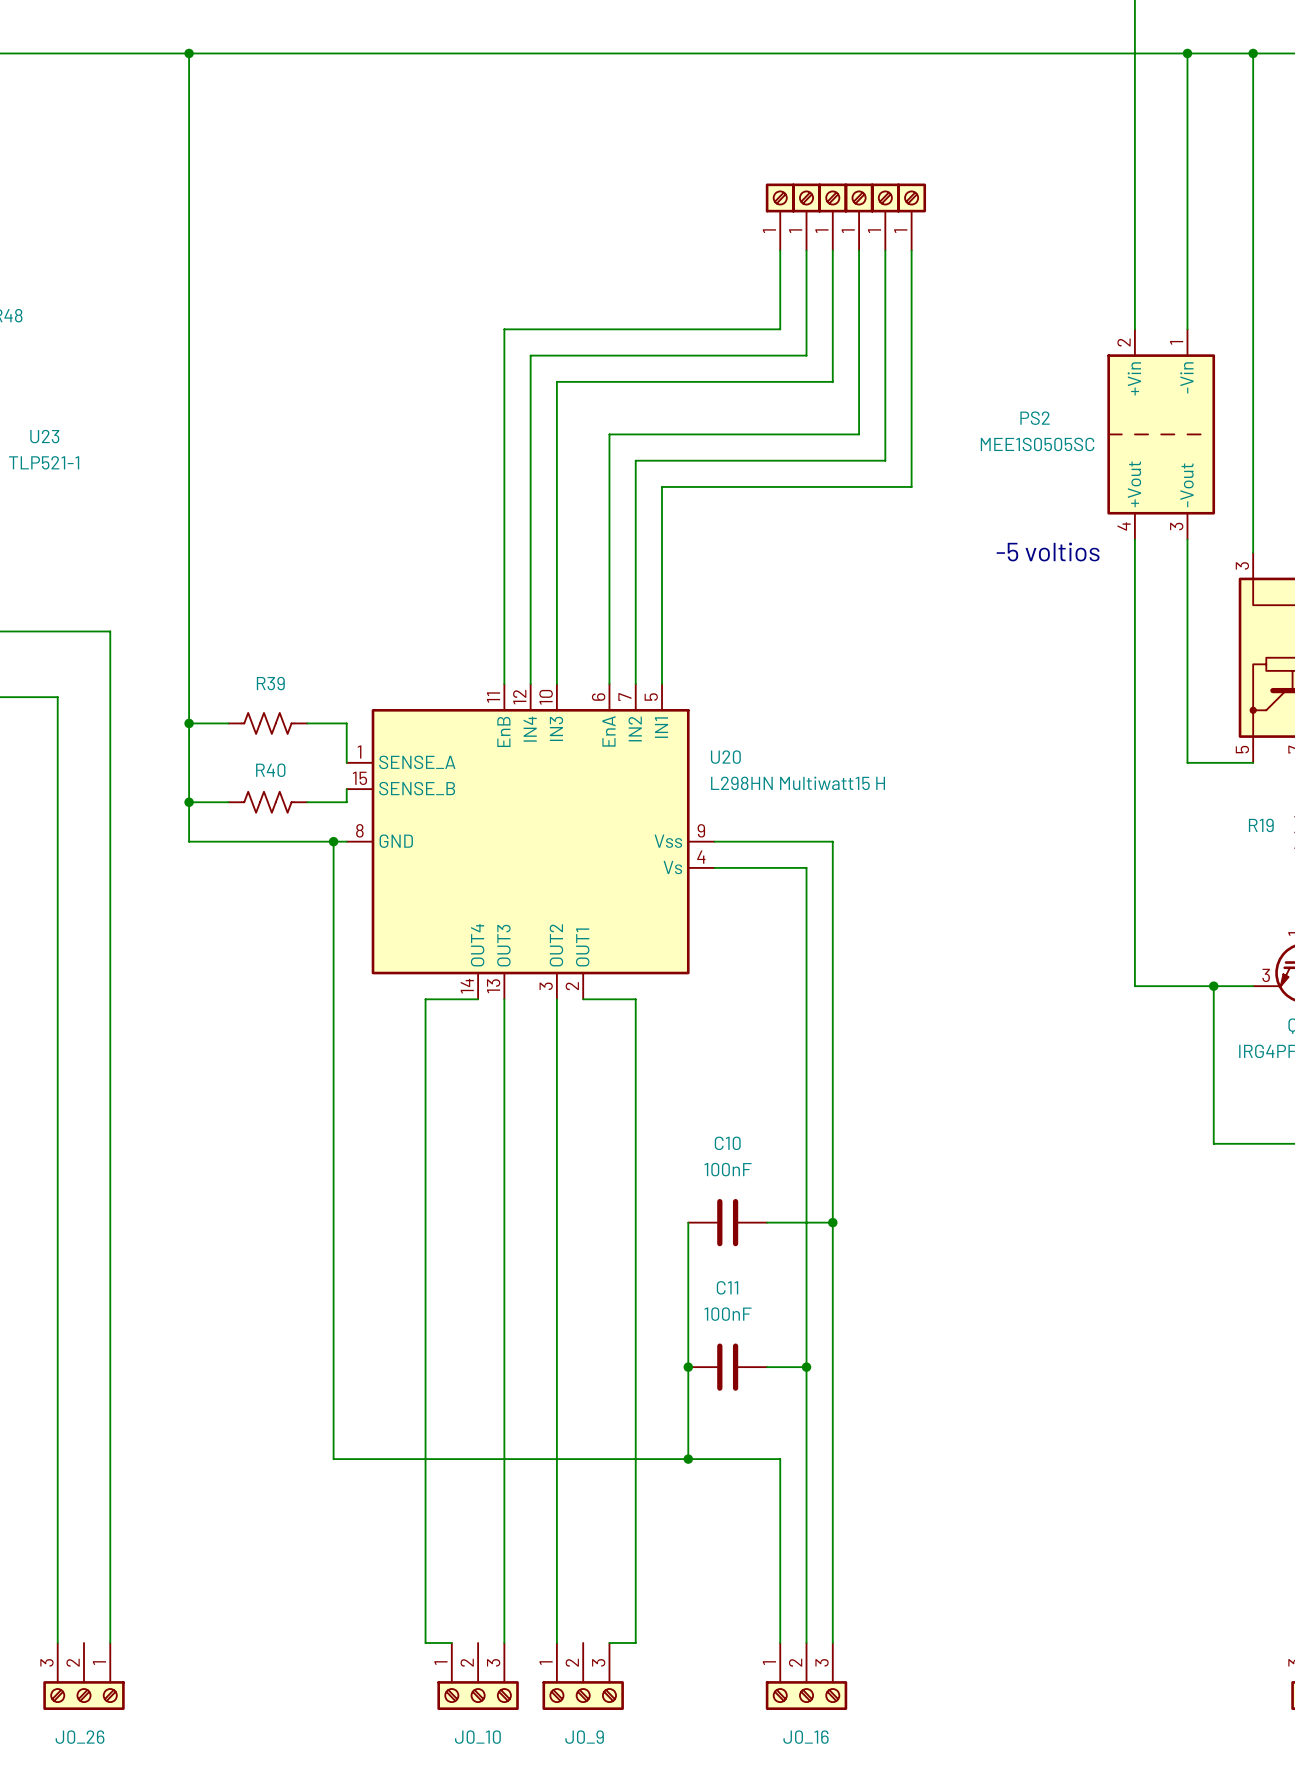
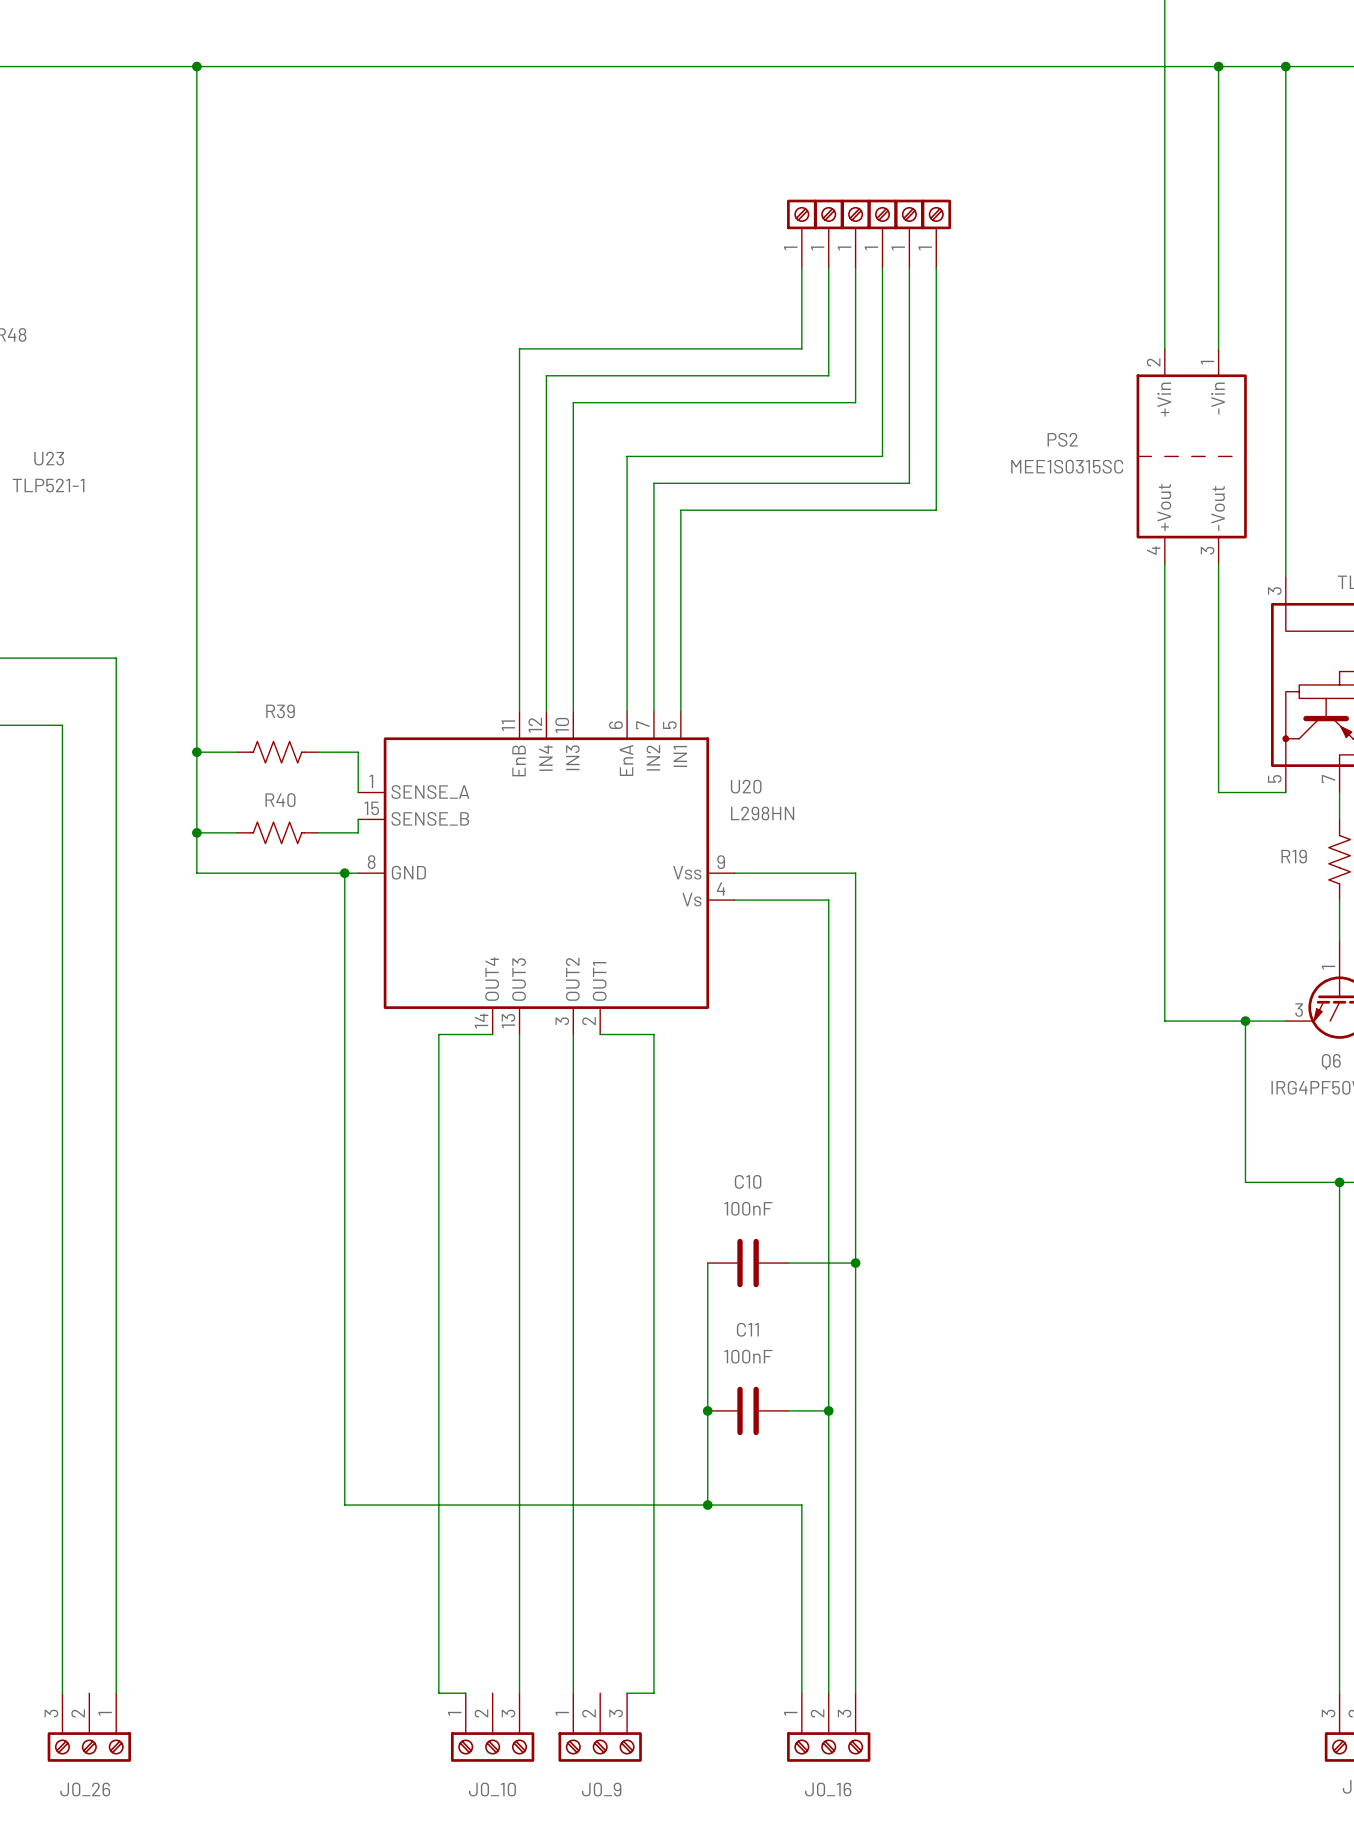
PS2 value: MEE1S0505SC (1037, 444) -> MEE1S0315SC (1067, 466)
text: -5 voltios (1048, 551) -> none
U20 value: L298HN Multiwatt15 H (798, 783) -> L298HN (762, 813)

